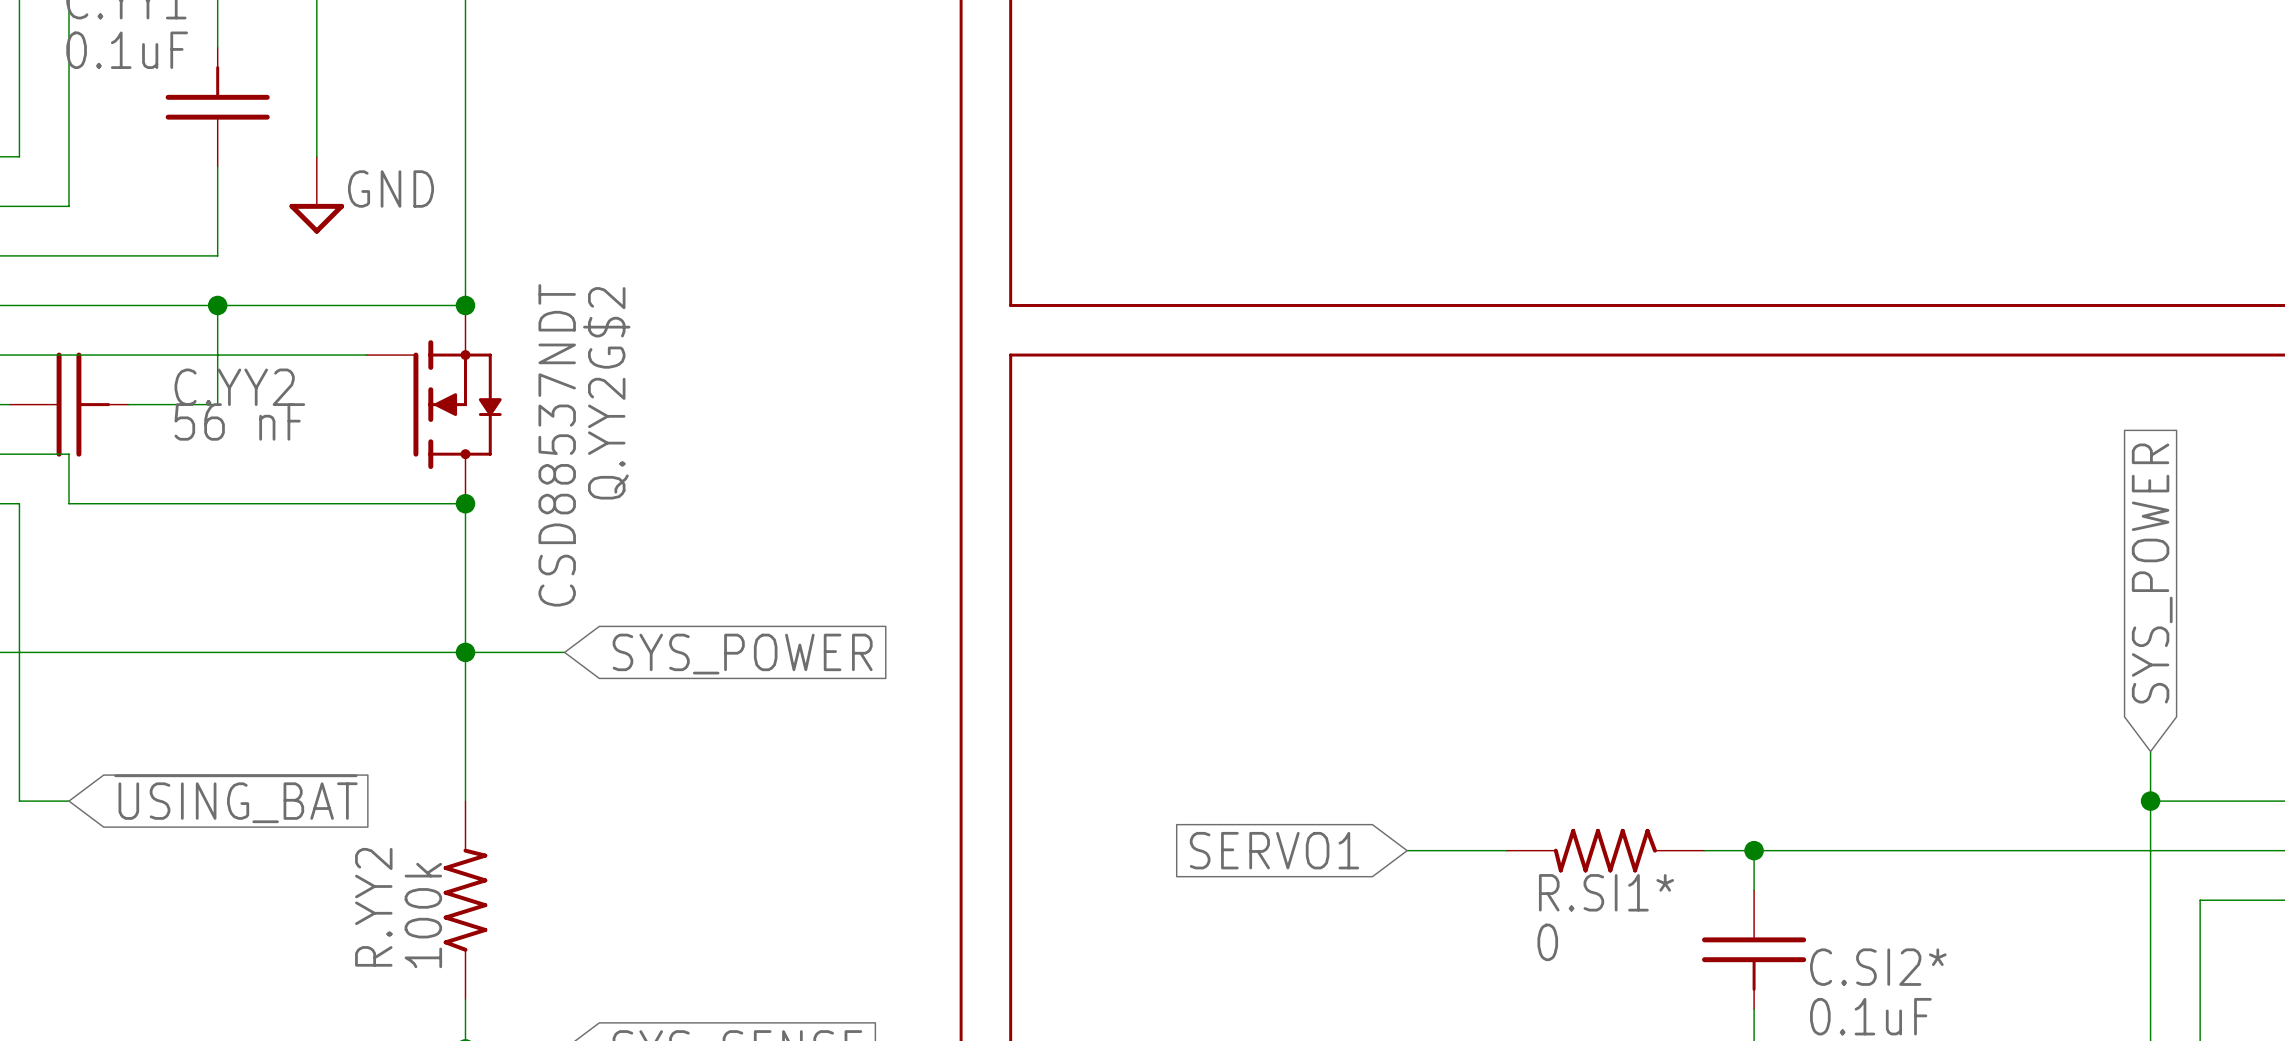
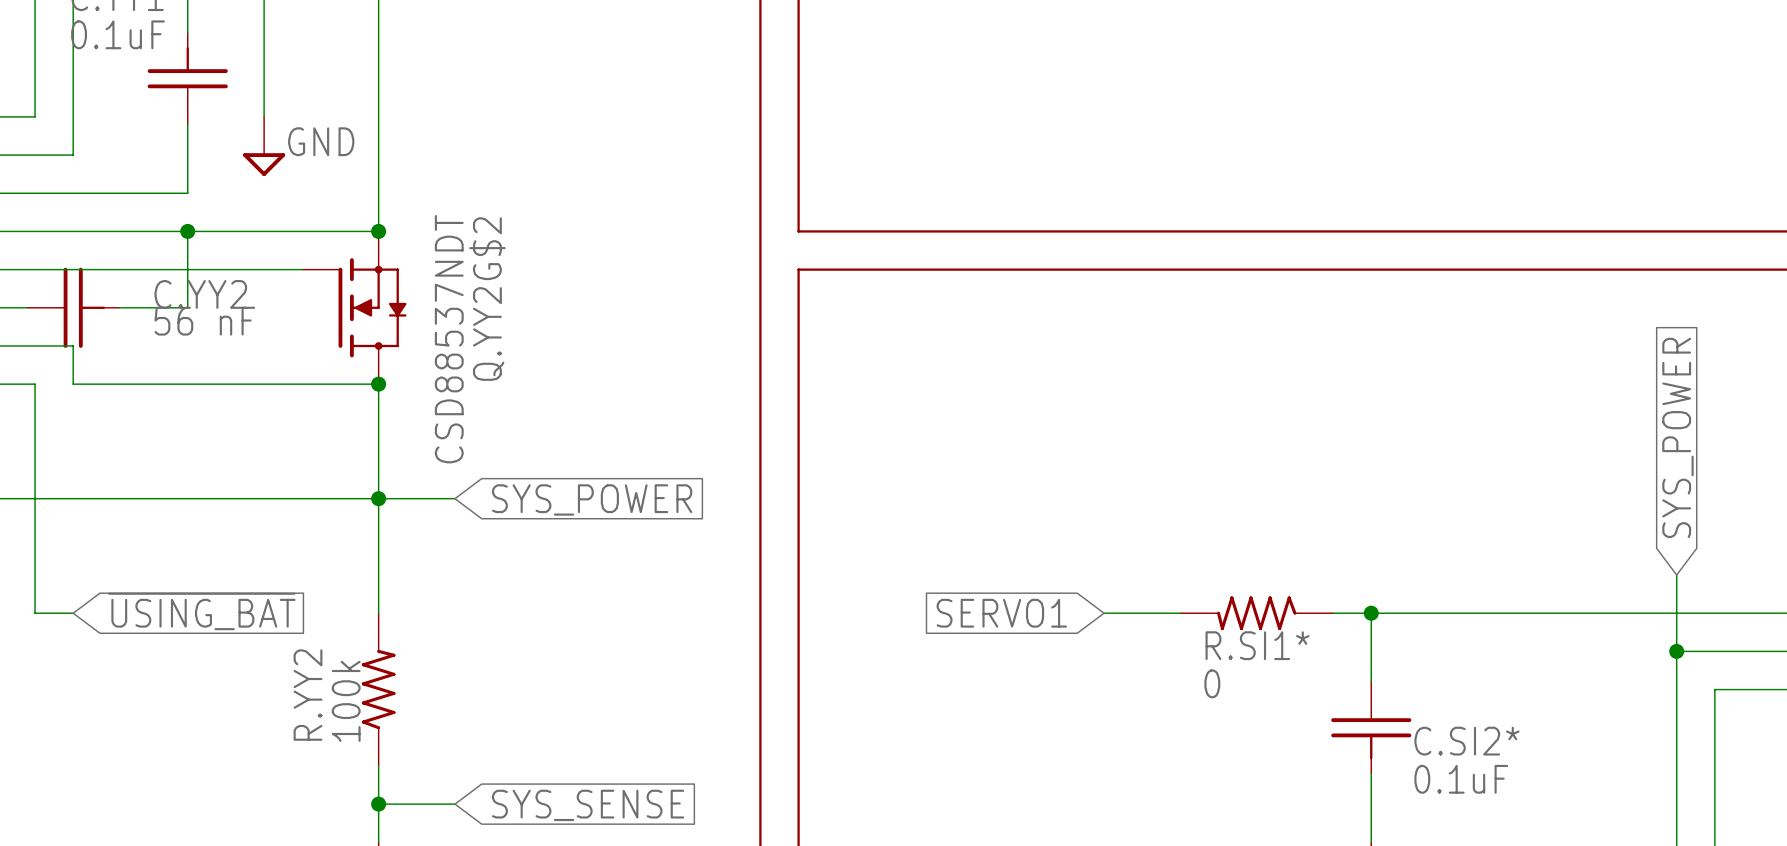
wire: none -> (1371, 613) (1371, 651)
junction position: (2150, 801) -> (1676, 651)
global label position: SERVO1 (1274, 850) -> SERVO1 (1001, 613)
wire: (1407, 850) (1506, 850) -> (1104, 613) (1180, 613)
R.SI1* position: (1605, 850) -> (1256, 613)
wire: (1704, 850) (2150, 850) -> (1333, 613) (1676, 613)
junction position: (1754, 850) -> (1371, 613)

